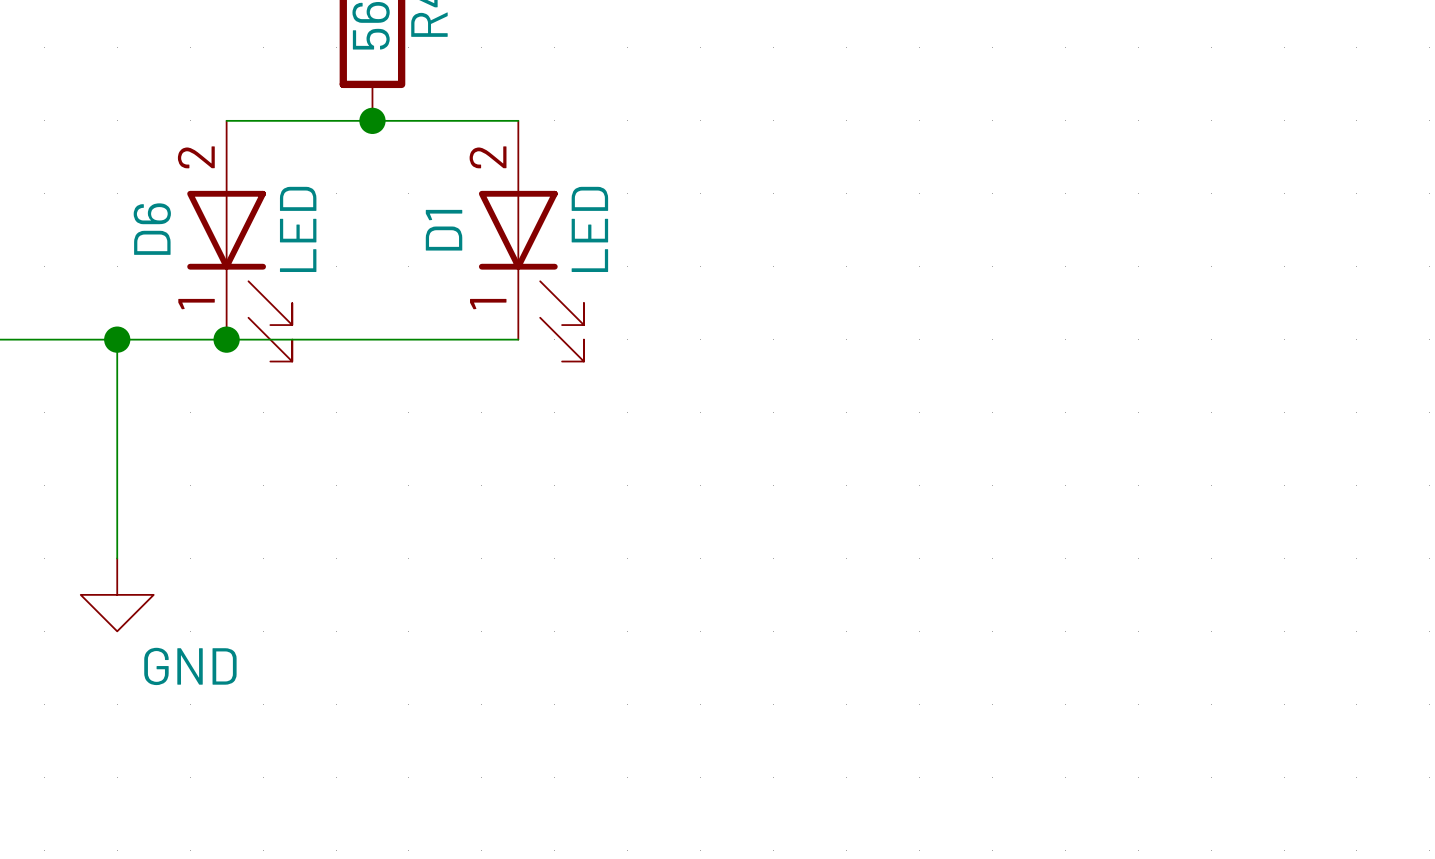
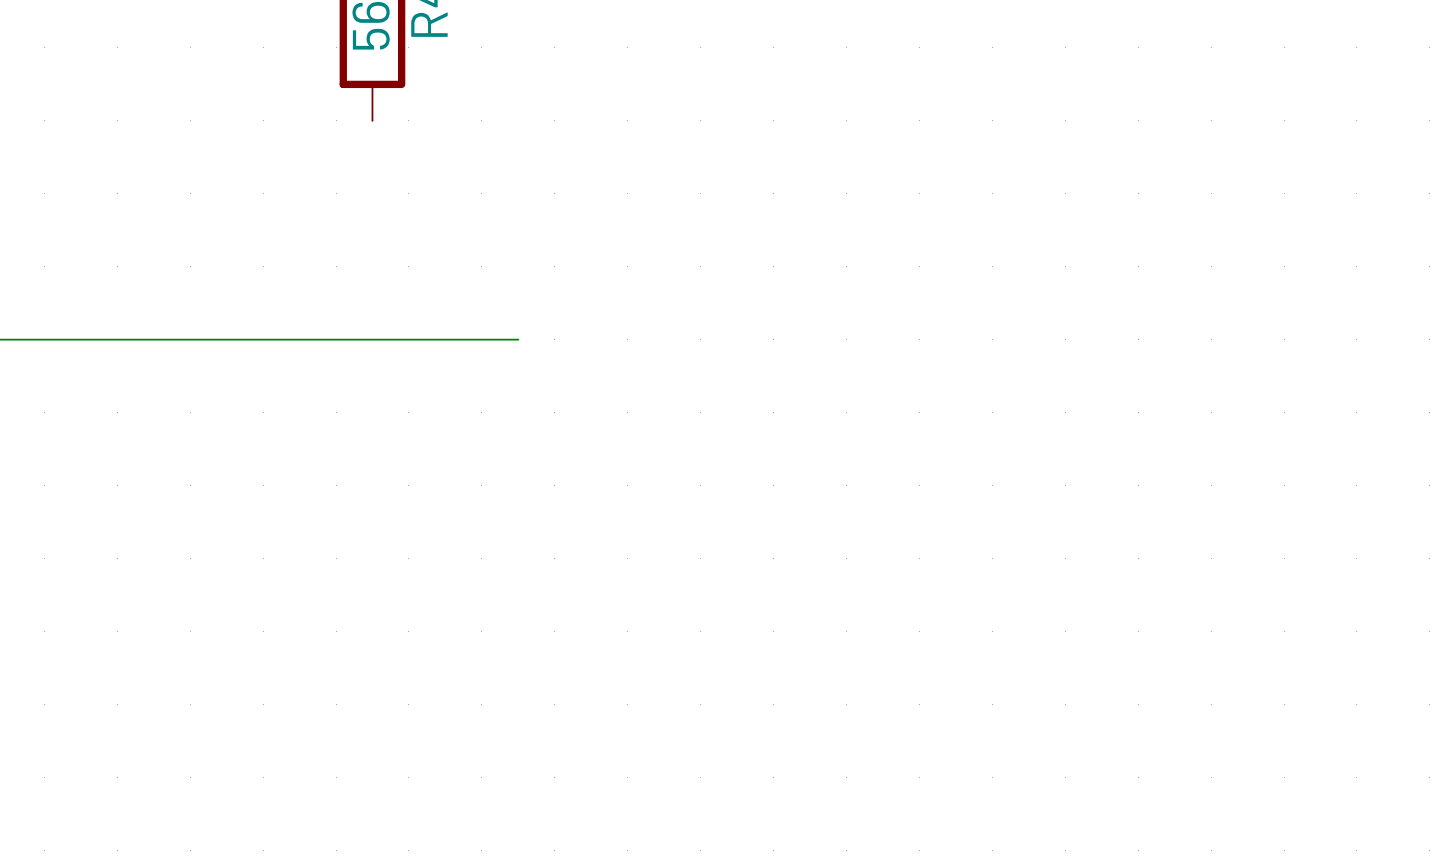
wire: (226, 120) (518, 120) -> none
junction: (372, 120) -> none
D6: LED (239, 241) -> none
D1: LED (531, 241) -> none
wire: (117, 339) (117, 558) -> none
junction: (117, 339) -> none
junction: (226, 339) -> none
power symbol: GND (117, 594) -> none

